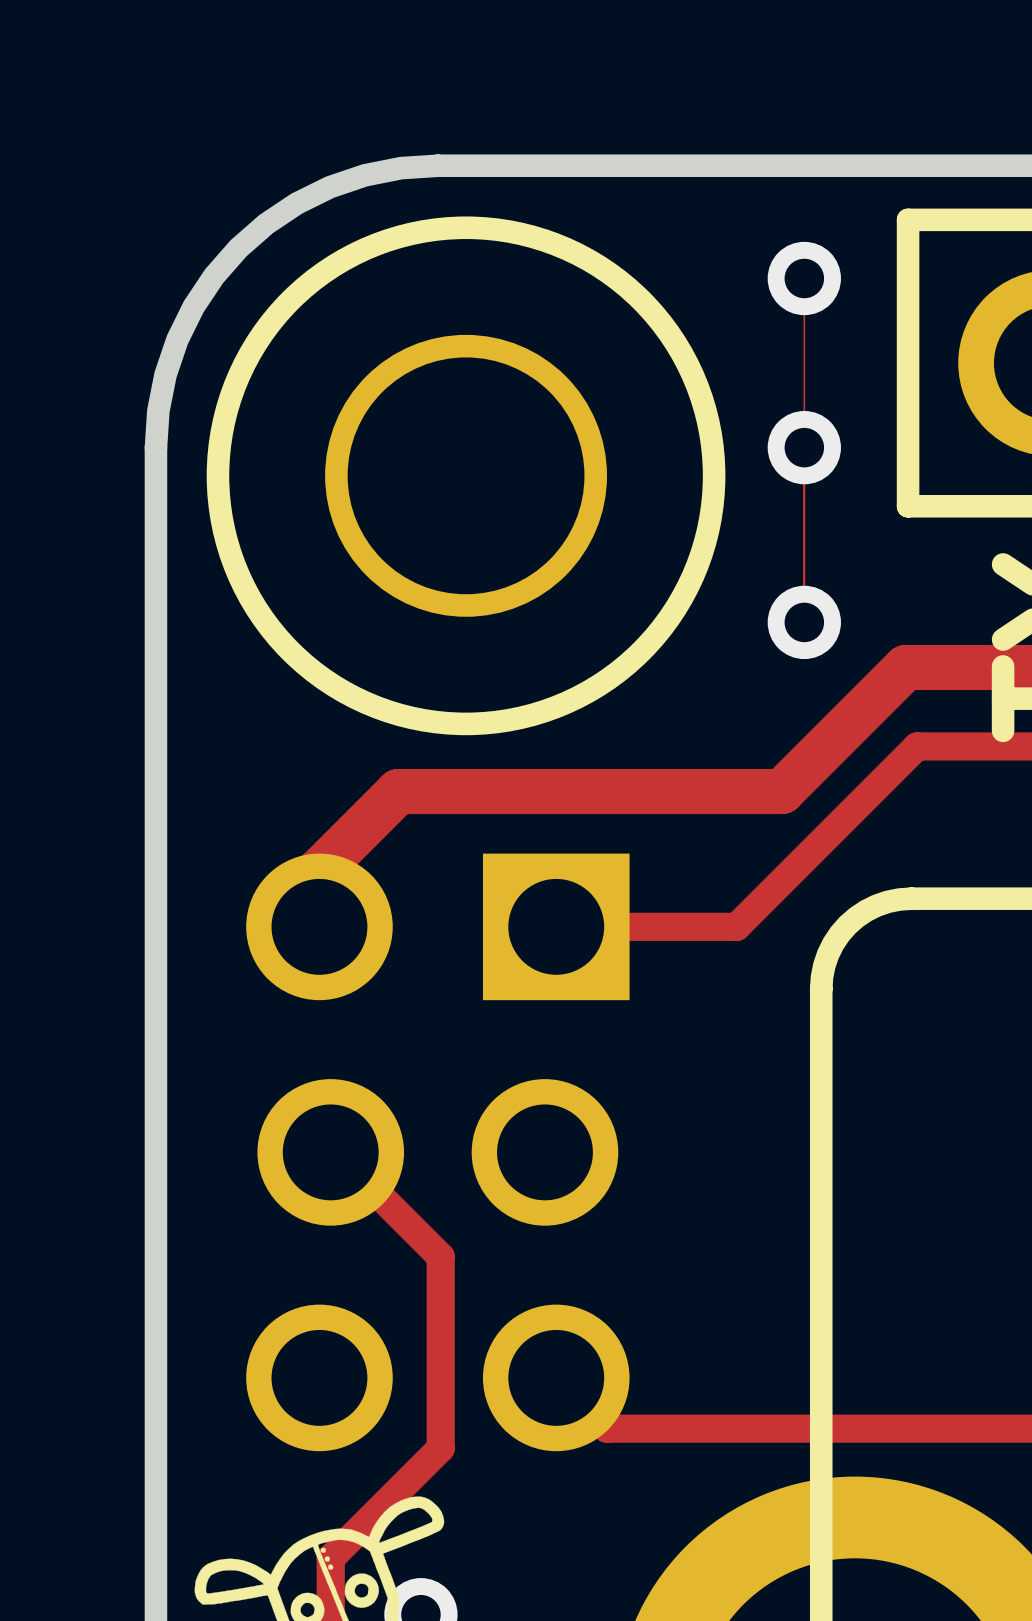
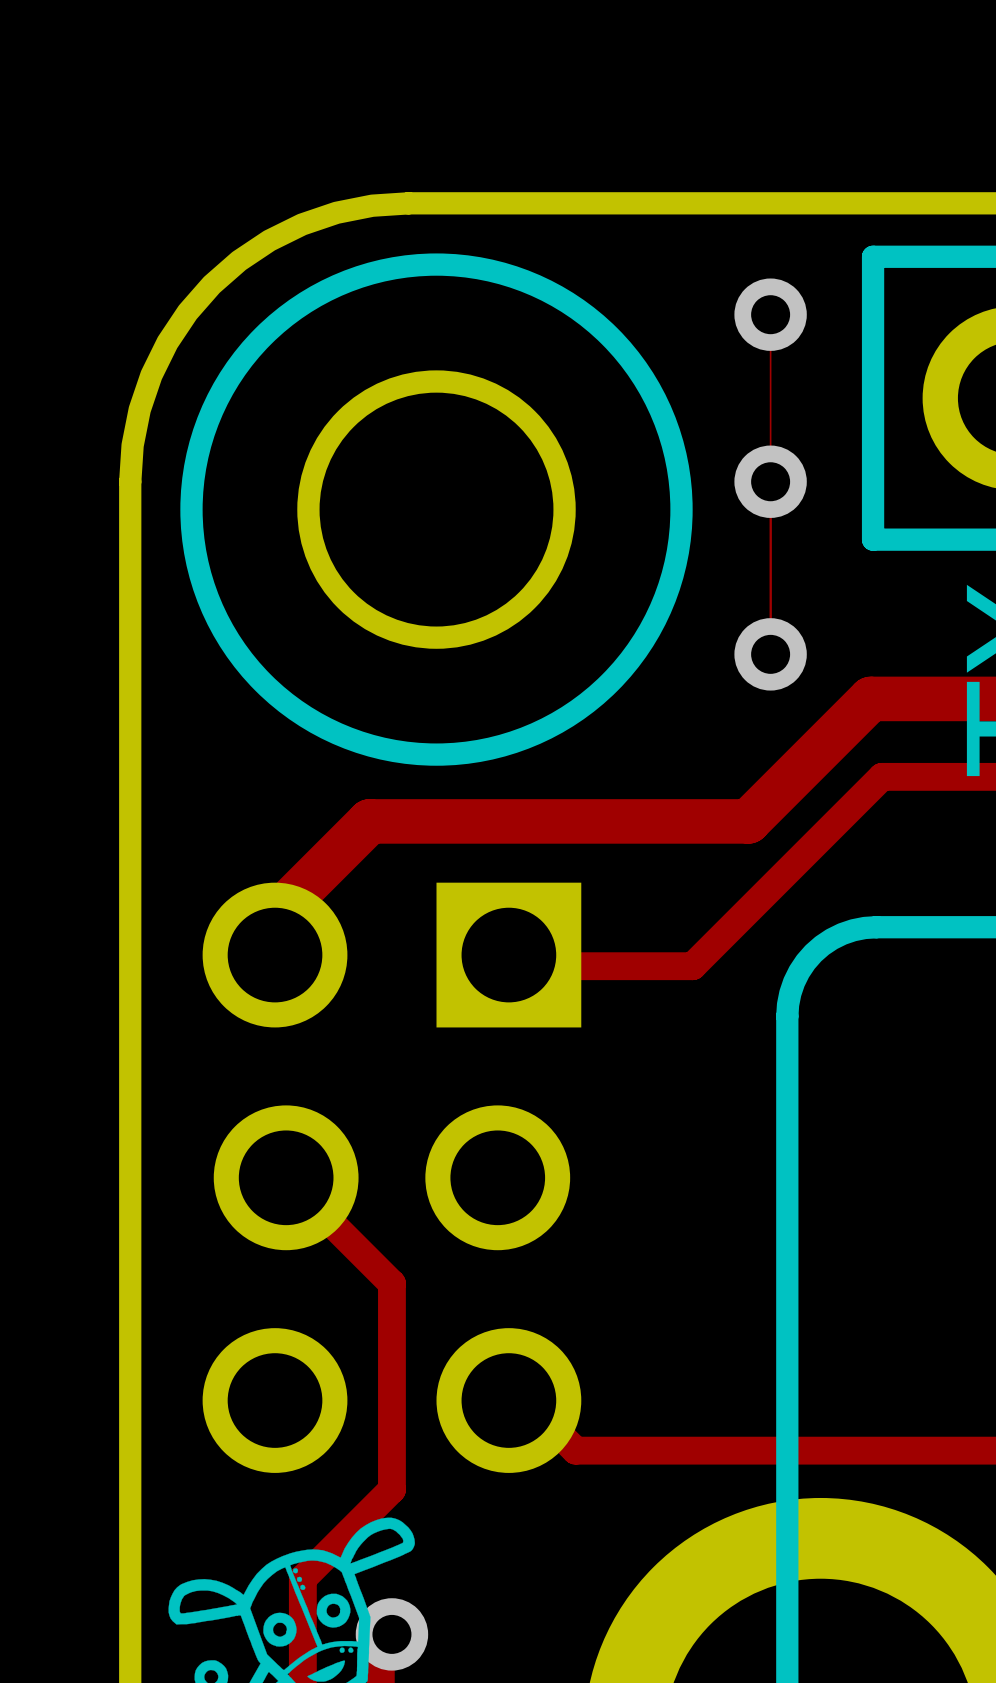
track: (736, 926) (556, 926) (567, 938) -> (703, 955) (692, 966) (520, 966) (508, 955)
track: (330, 1152) (336, 1152) (440, 1256) (440, 1448) (420, 1468) -> (291, 1177) (286, 1177) (391, 1283) (391, 1489)
part position: (437, 1152) -> (391, 1177)

